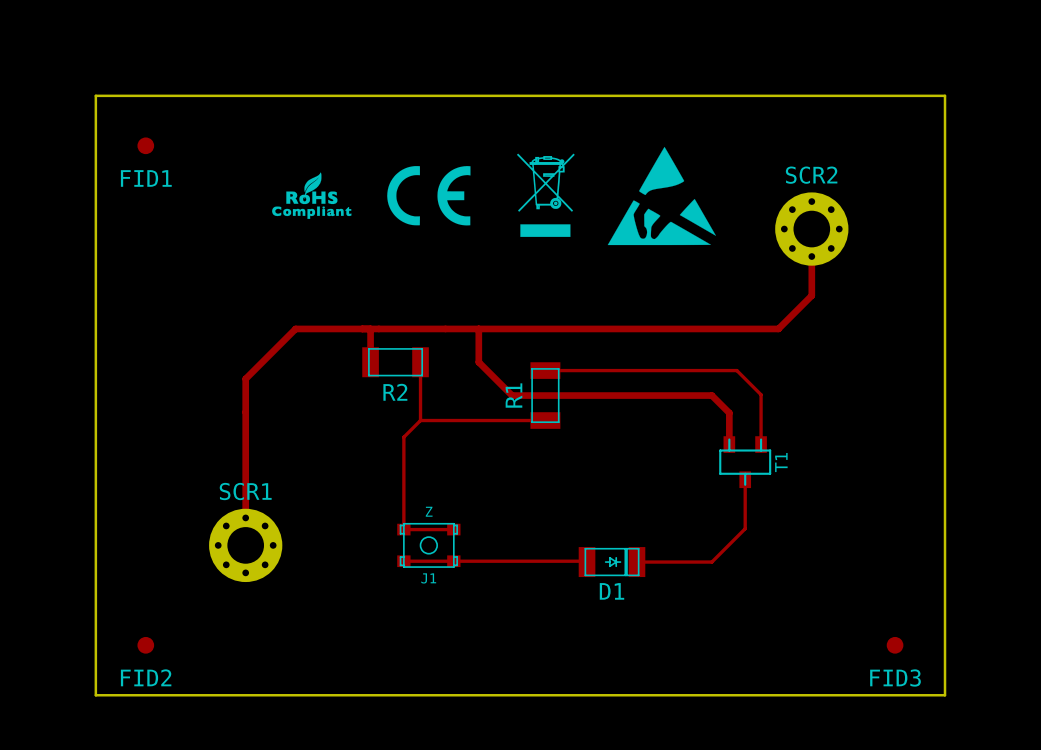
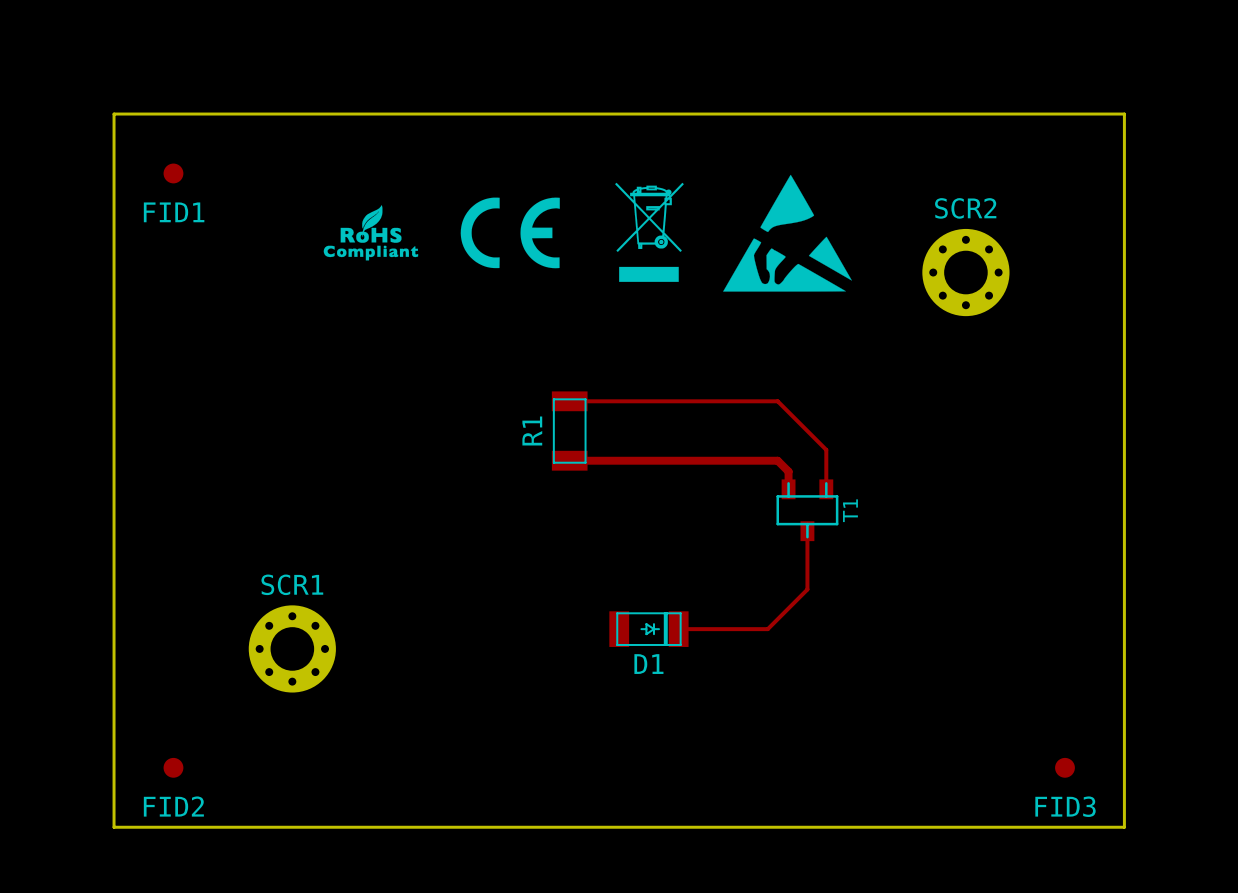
track: (811, 229) (811, 295) (778, 328) (295, 328) (245, 378) (245, 545) -> none
track: (370, 328) (370, 362) -> none
track: (478, 328) (478, 362) (512, 395) (711, 395) (729, 412) (729, 444) -> none
track: none -> (569, 401) (777, 401) (826, 449) (826, 489)
R2: (395, 362) -> none
track: (420, 362) (420, 420) -> none
track: (545, 370) (736, 370) (761, 394) (761, 444) -> none
track: none -> (569, 460) (777, 460) (788, 471) (788, 489)
R1 position: (545, 395) -> (569, 431)
track: (420, 420) (545, 420) -> none
track: (420, 420) (403, 437) (403, 529) (453, 529) -> none
T1 position: (745, 462) -> (807, 510)
track: (745, 479) (745, 528) (711, 562) (636, 562) -> (807, 531) (807, 589) (767, 629) (678, 629)
J1: Z (428, 545) -> none
track: (403, 561) (587, 562) -> none
D1 position: (612, 562) -> (648, 629)

